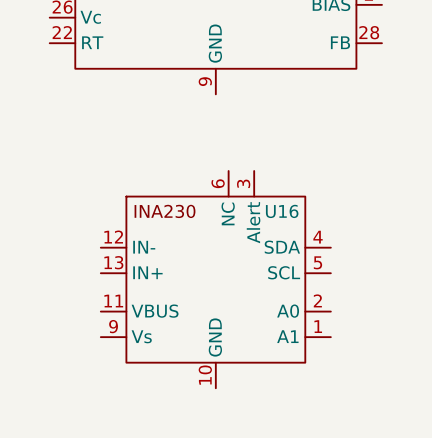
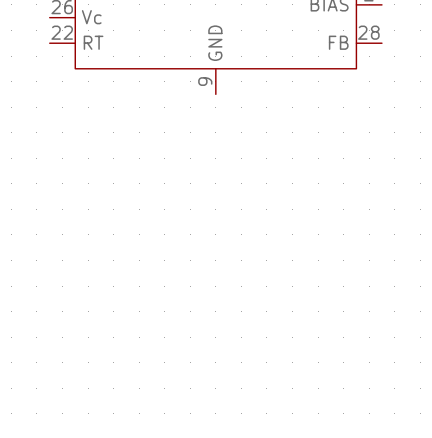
U16: (215, 279) -> none

